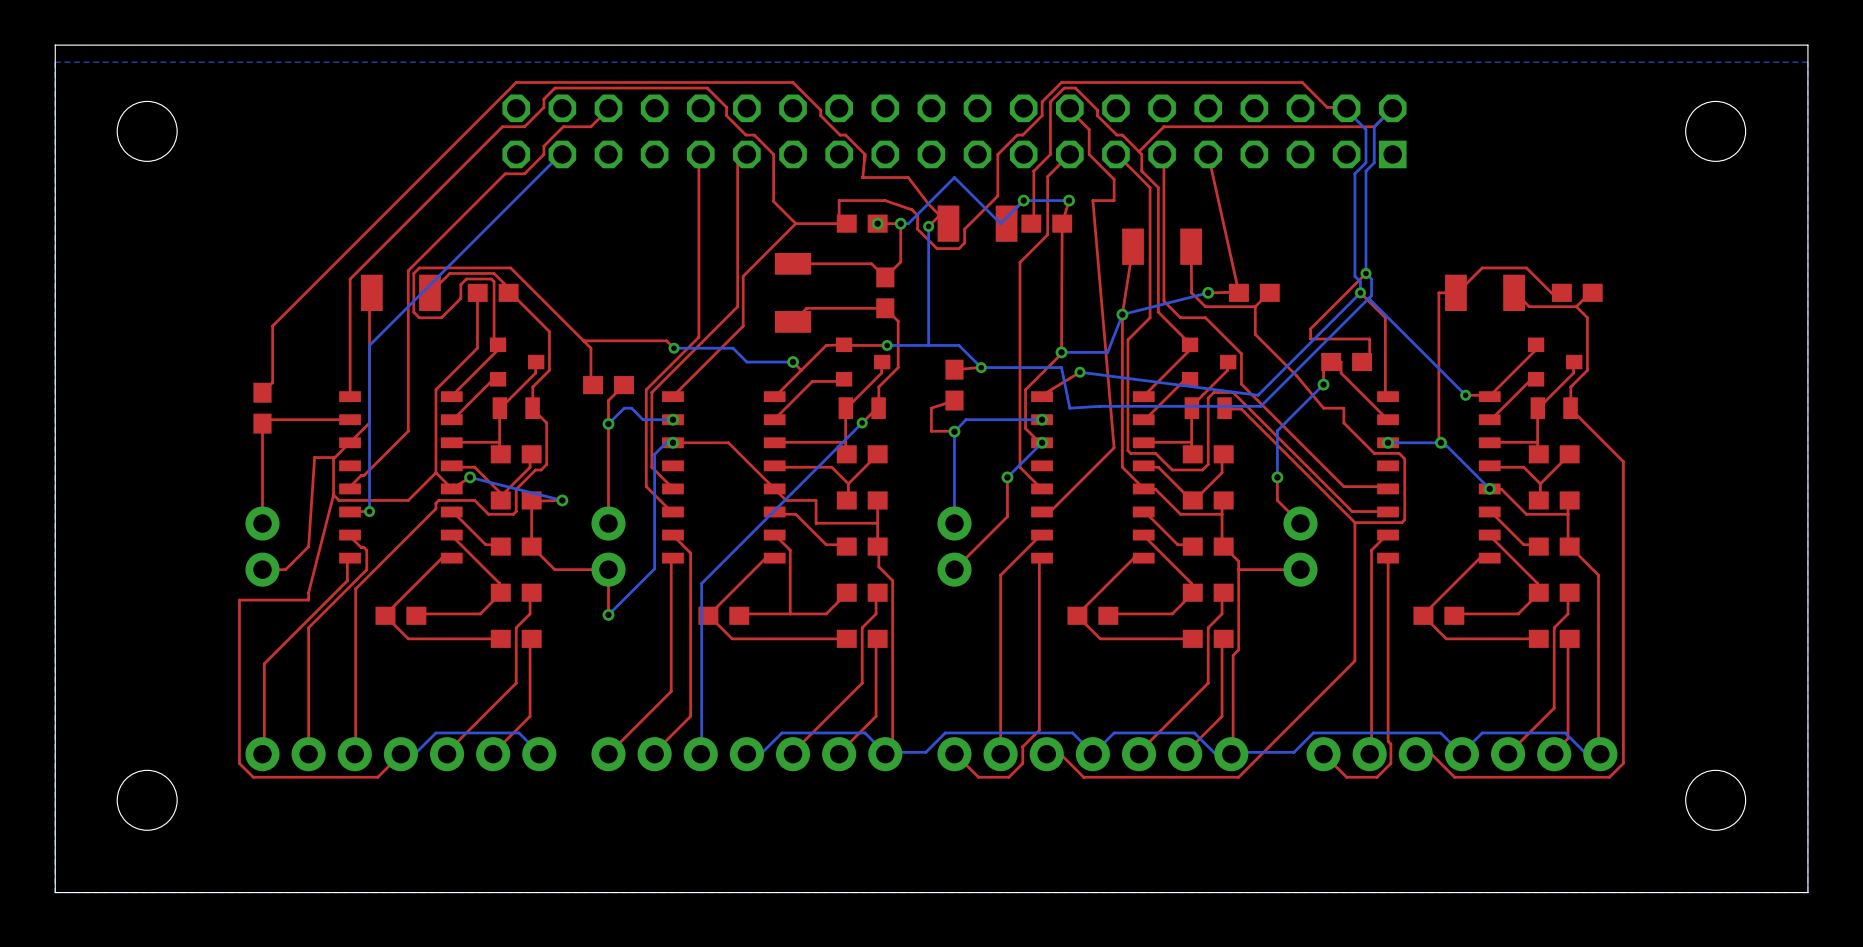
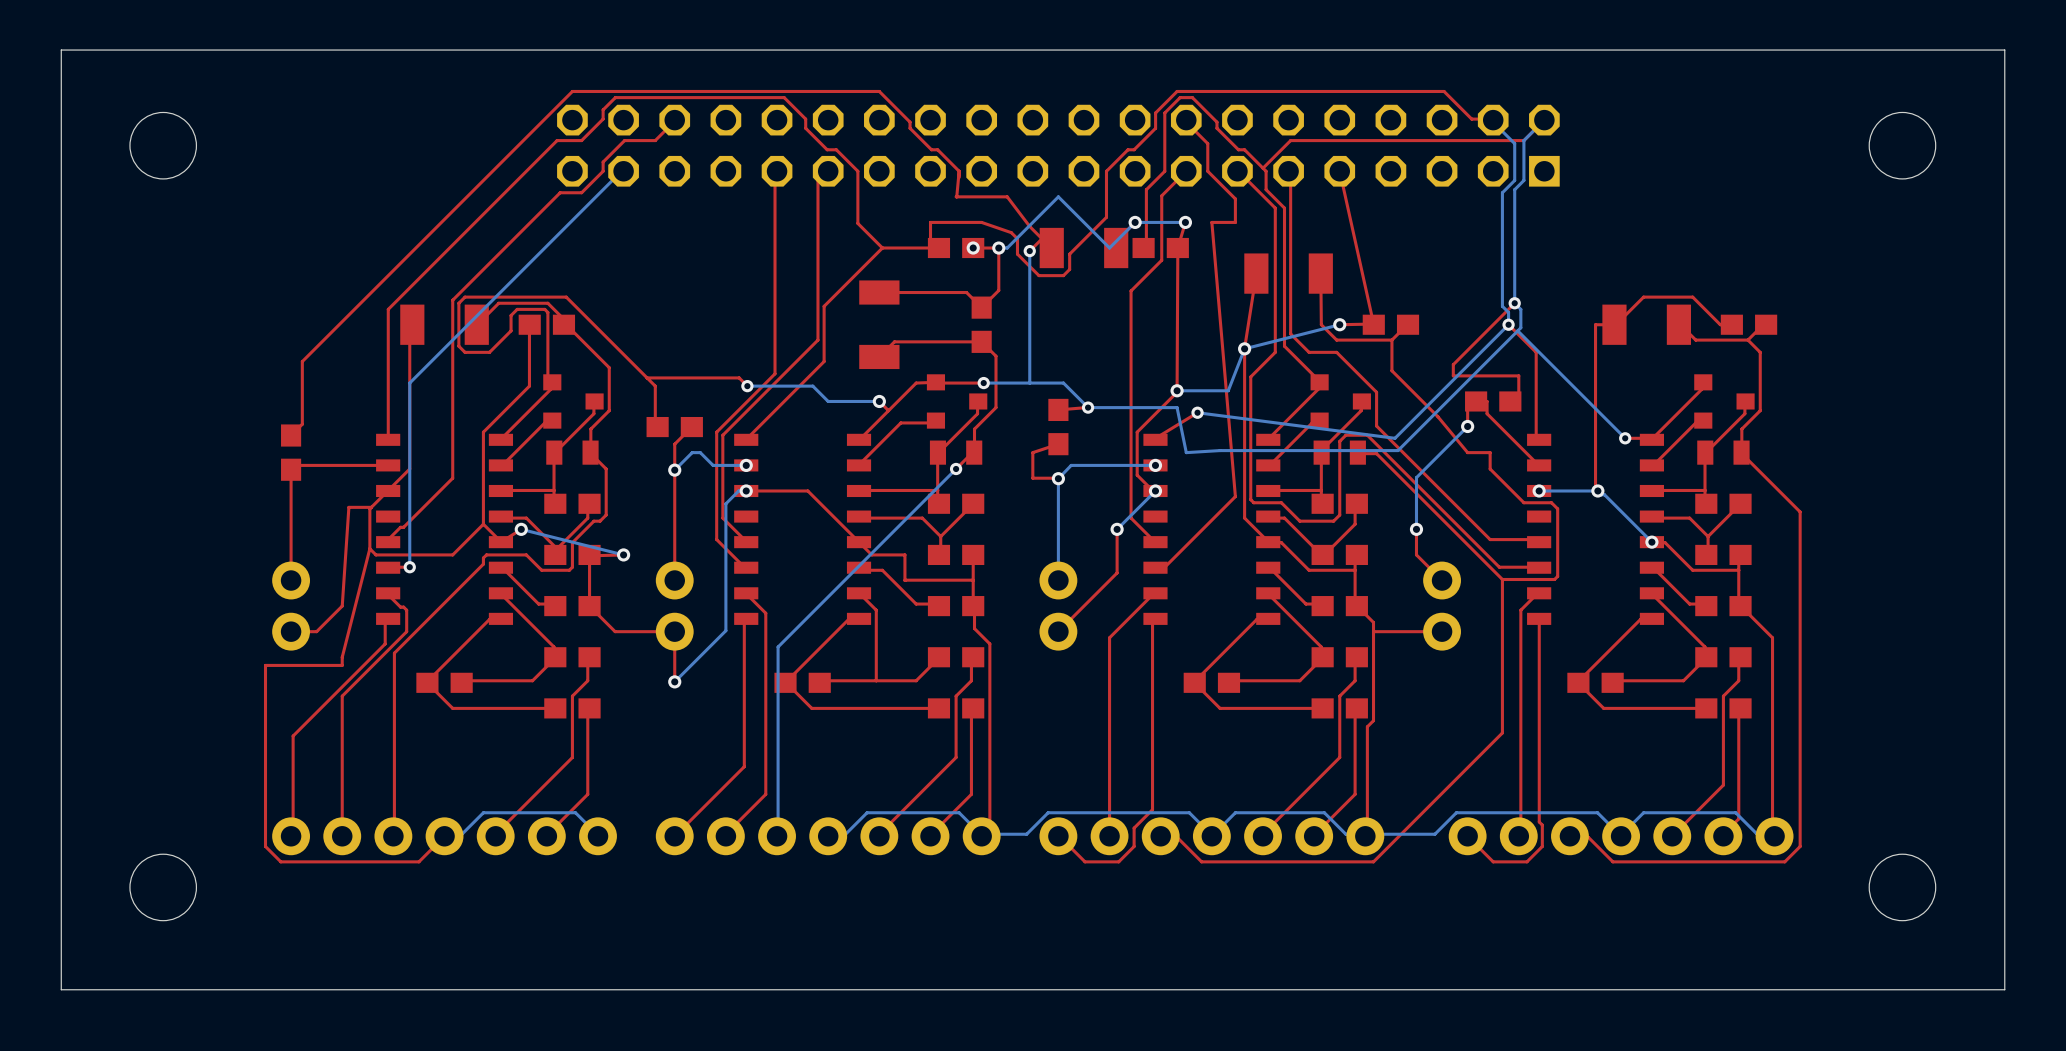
bottom zone outline: (1807, 62) (54, 62) (54, 892) (1807, 892) (1807, 62) -> none

